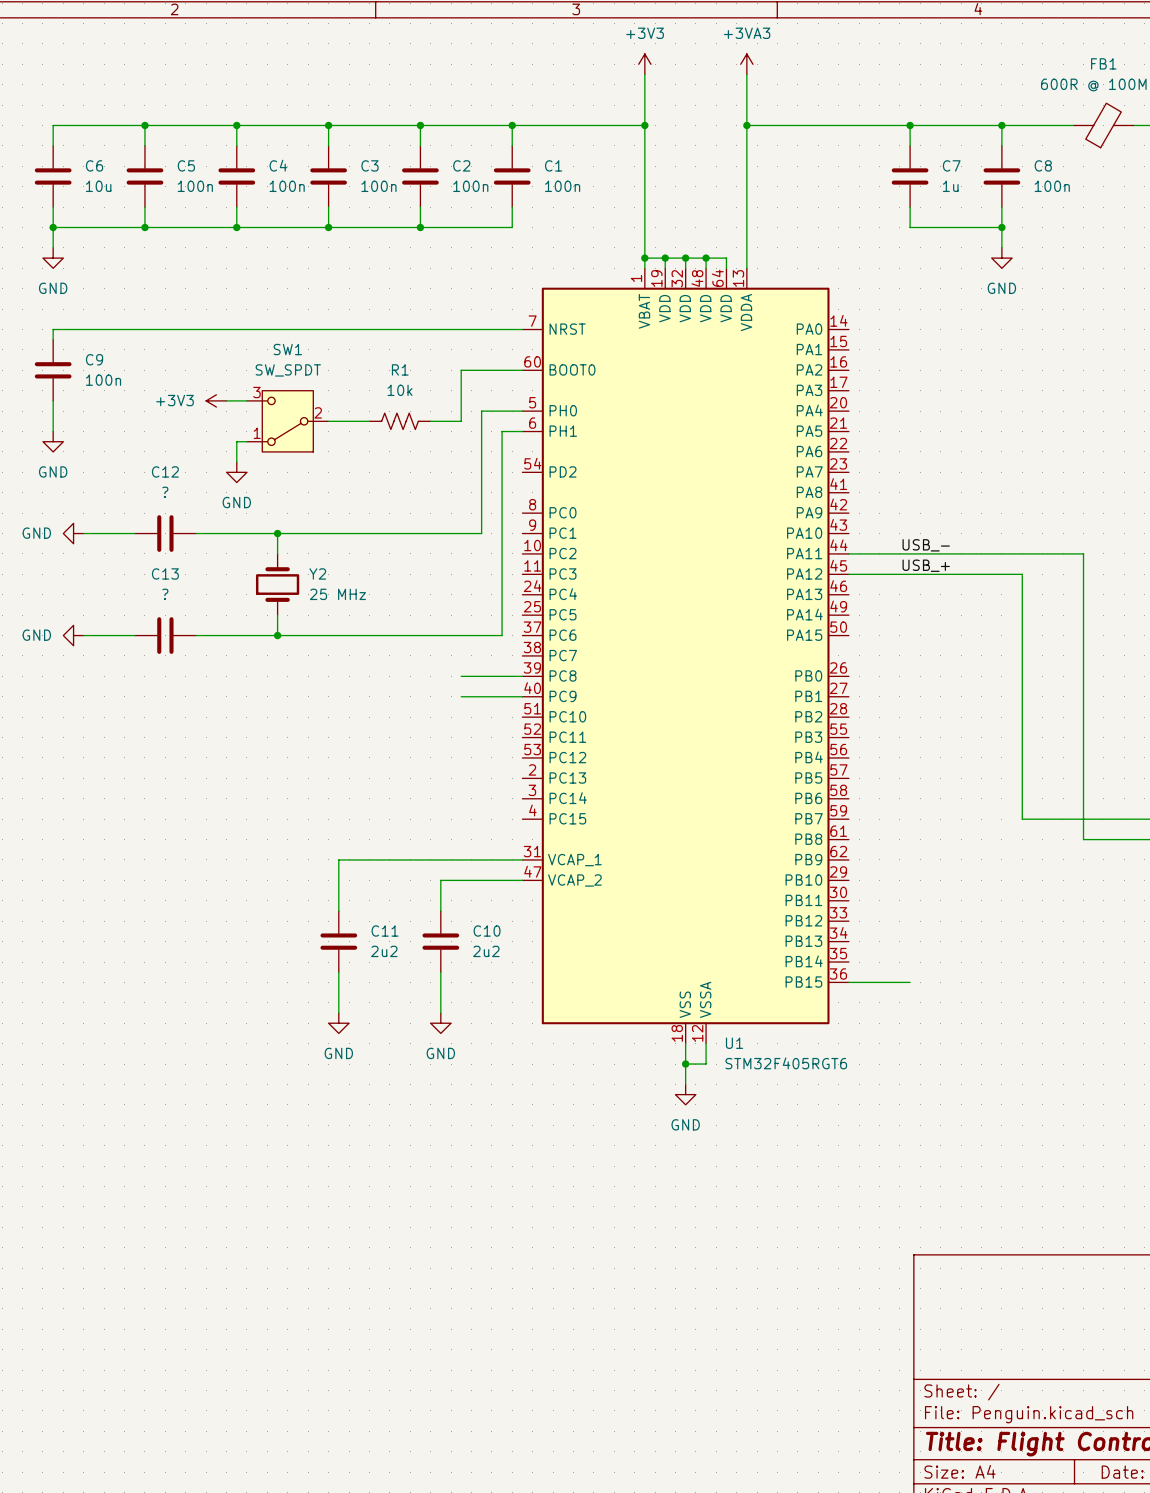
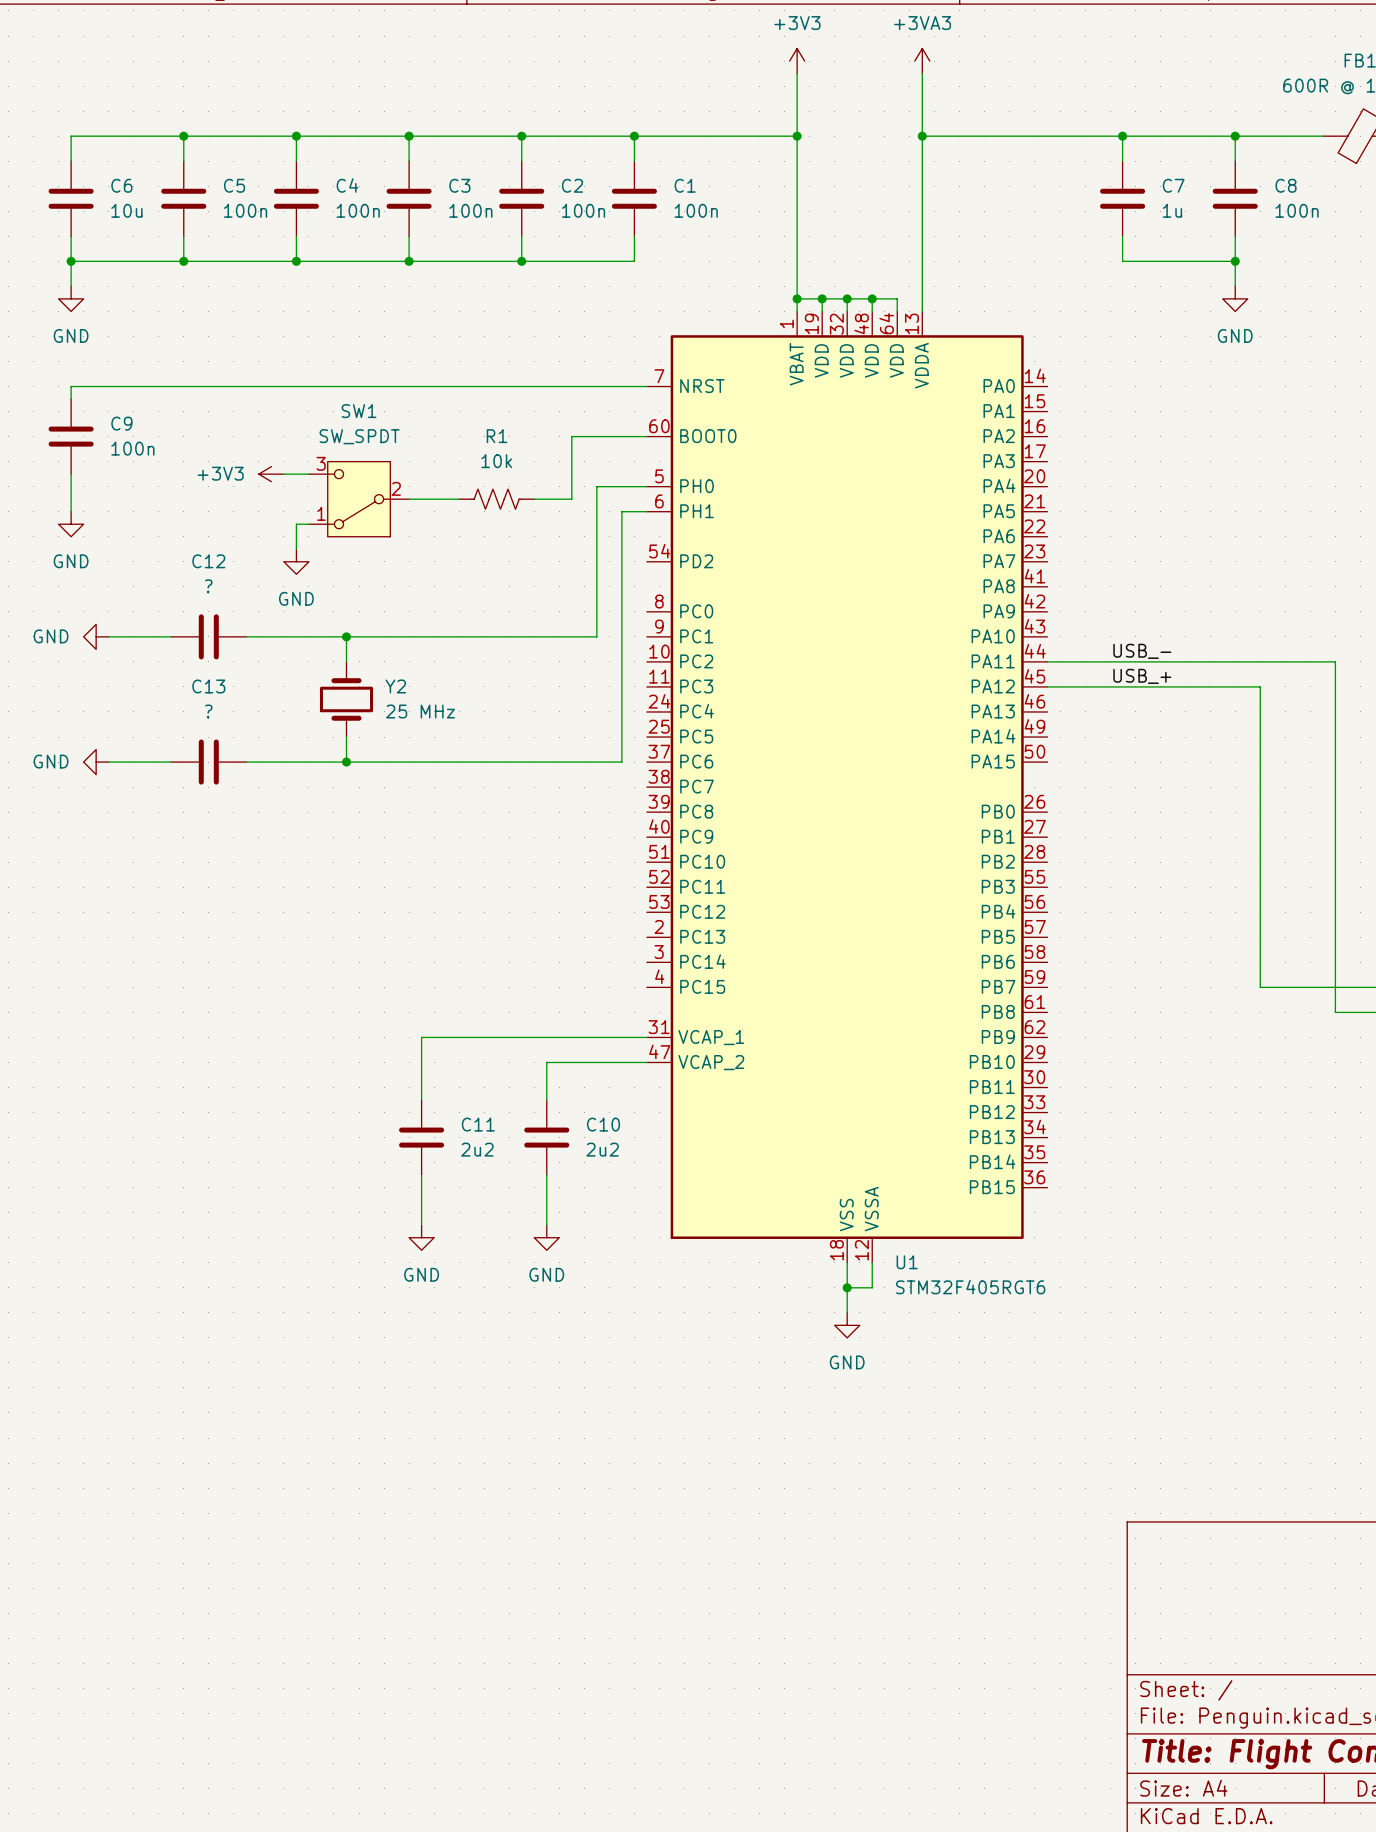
wire: (461, 676) (522, 676) -> none
wire: (461, 696) (522, 696) -> none
wire: (848, 982) (910, 982) -> none

